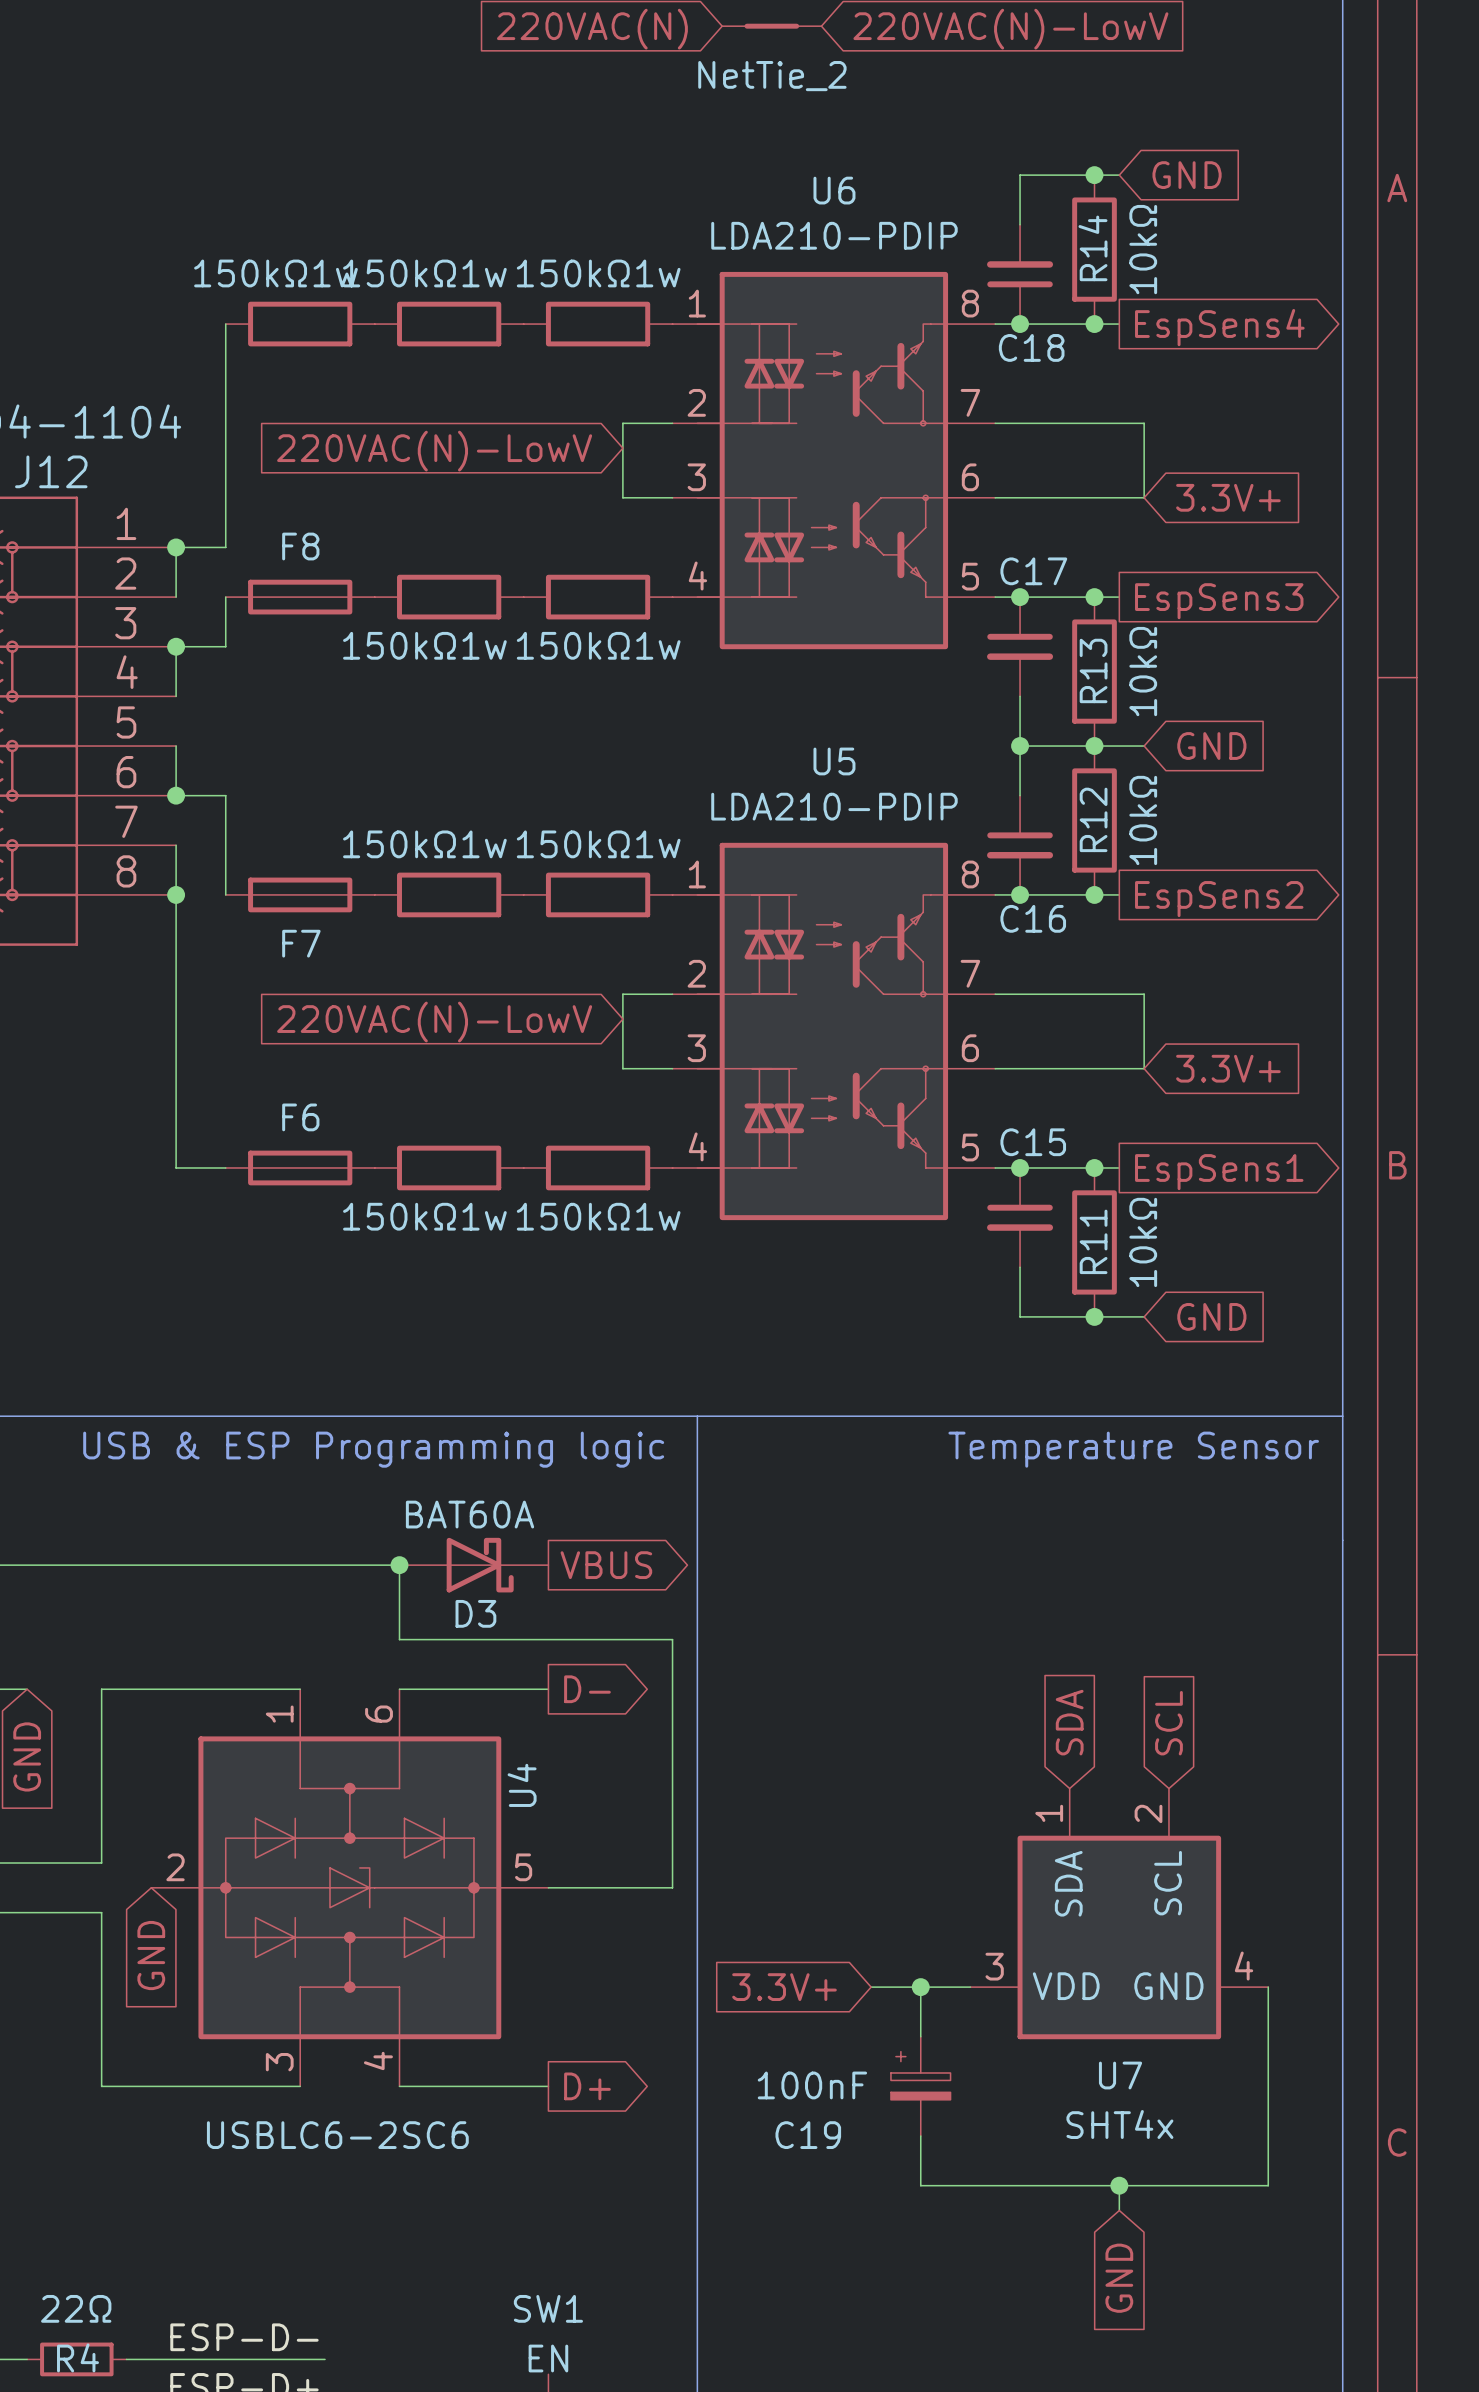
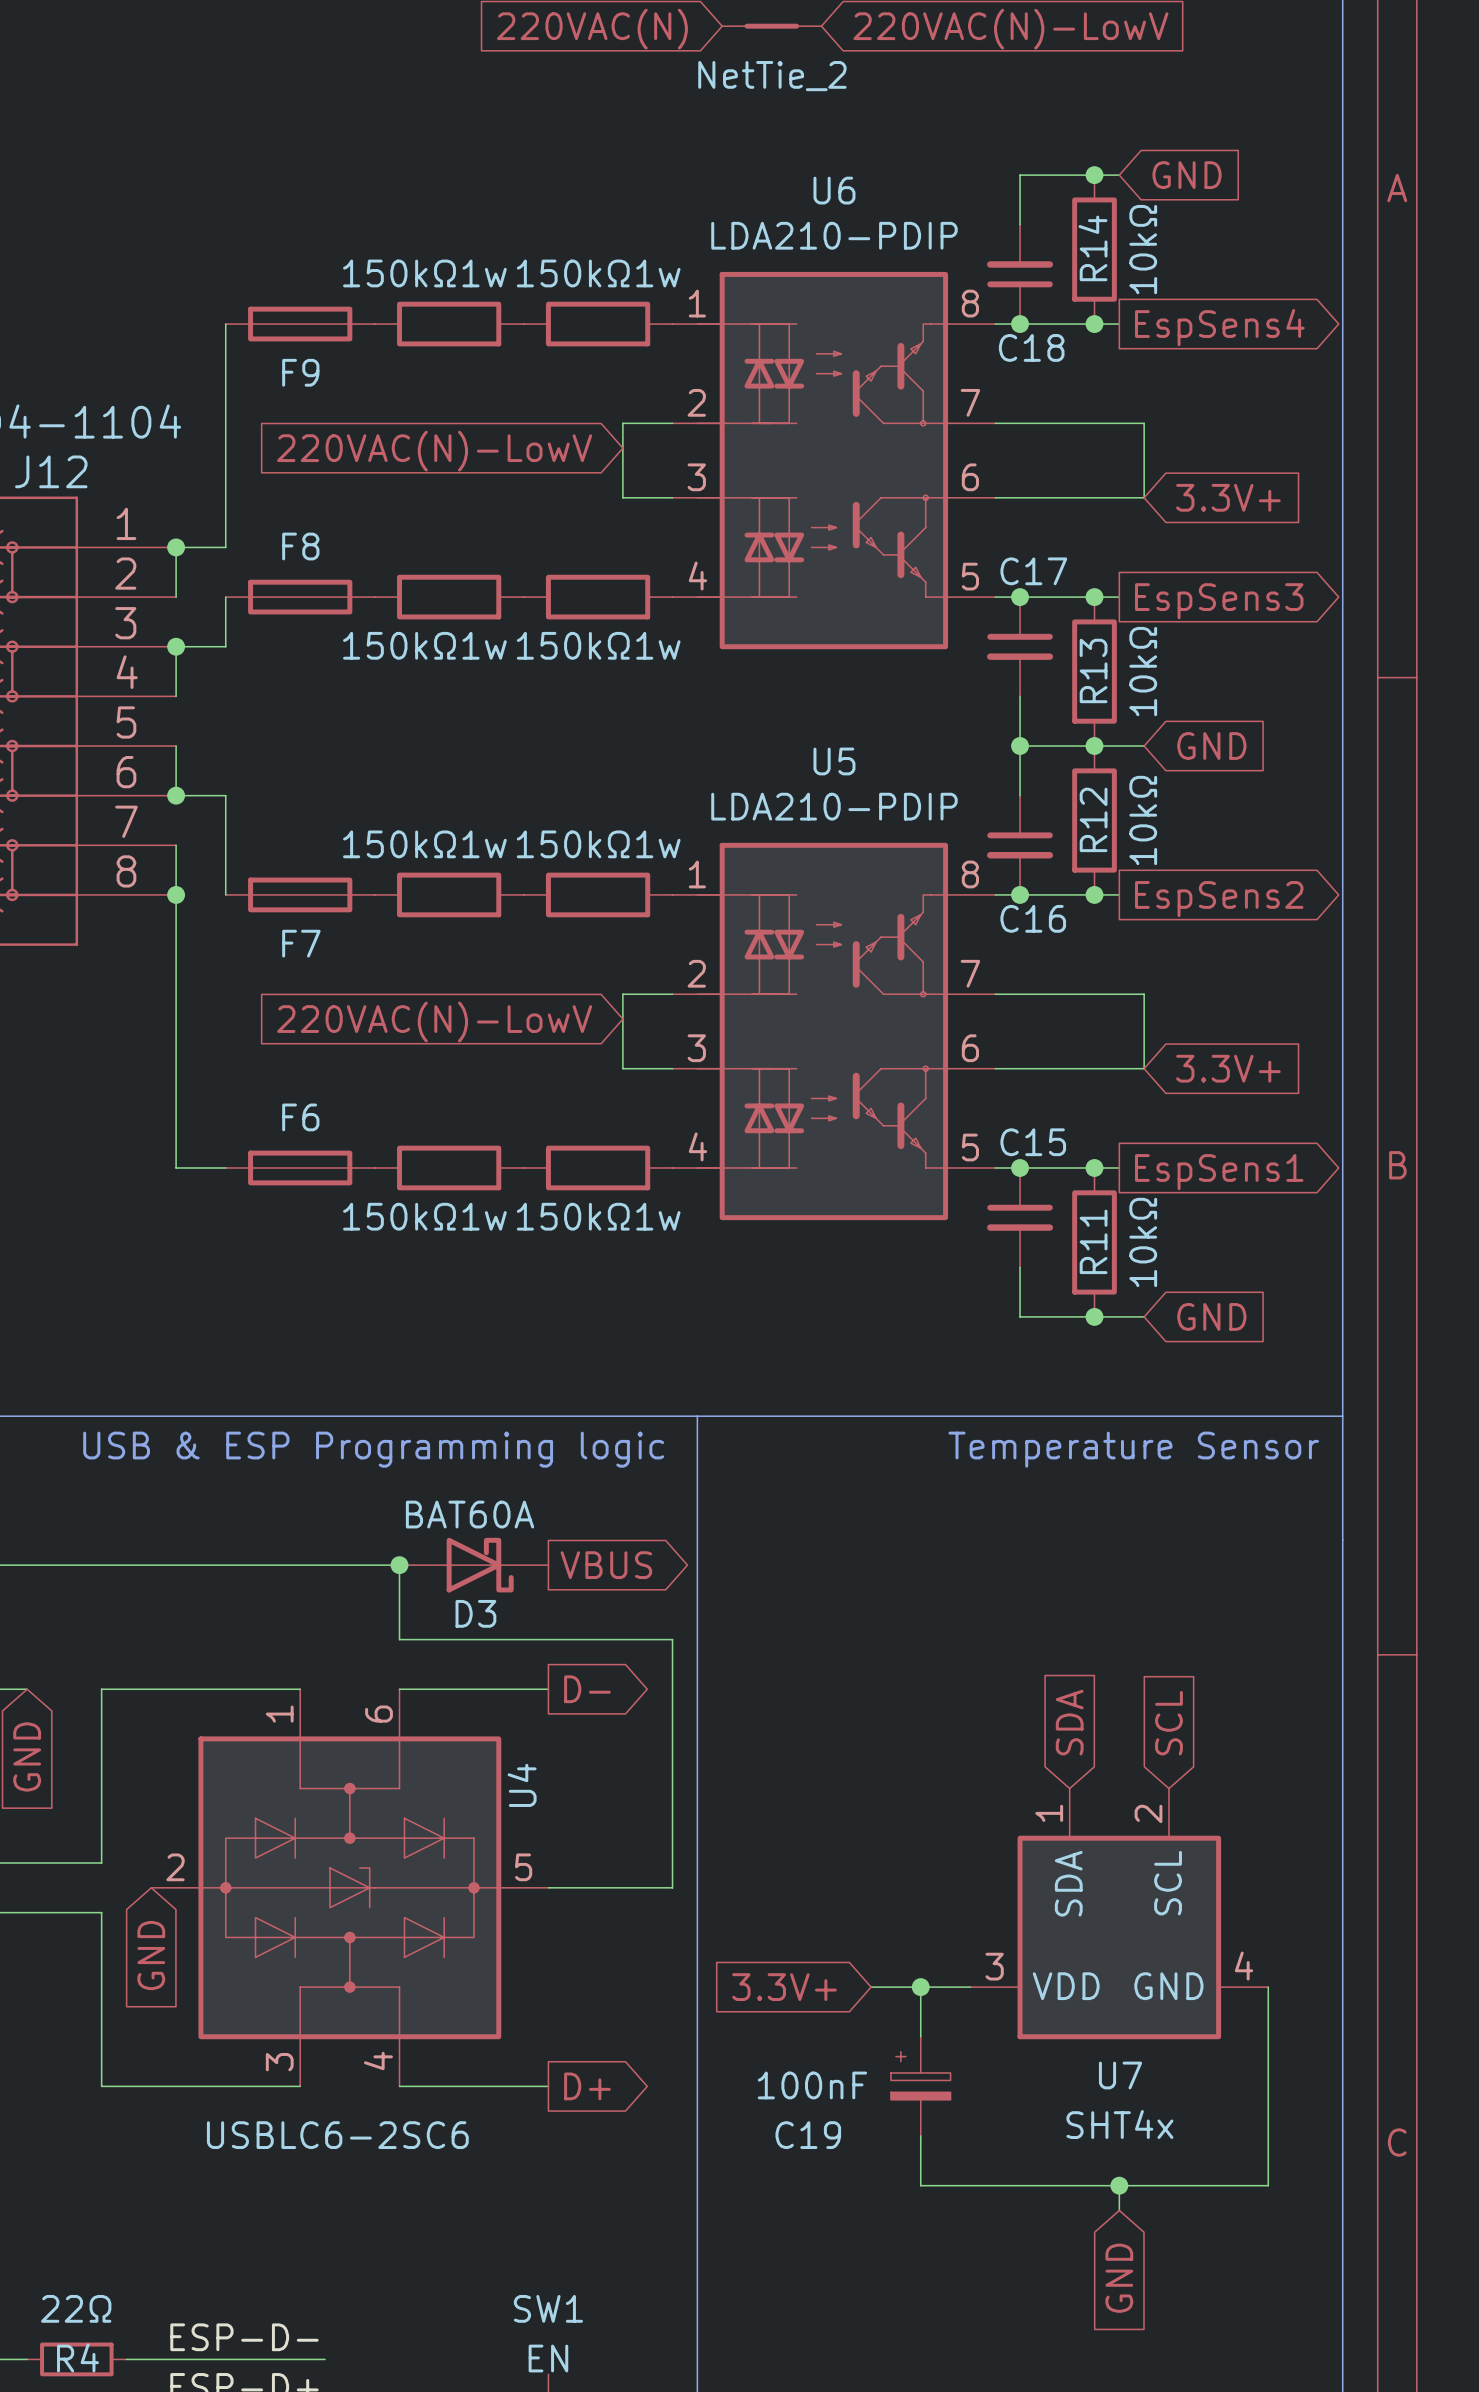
part: 150kΩ1w (300, 324) -> none
F9: none -> (300, 324)

